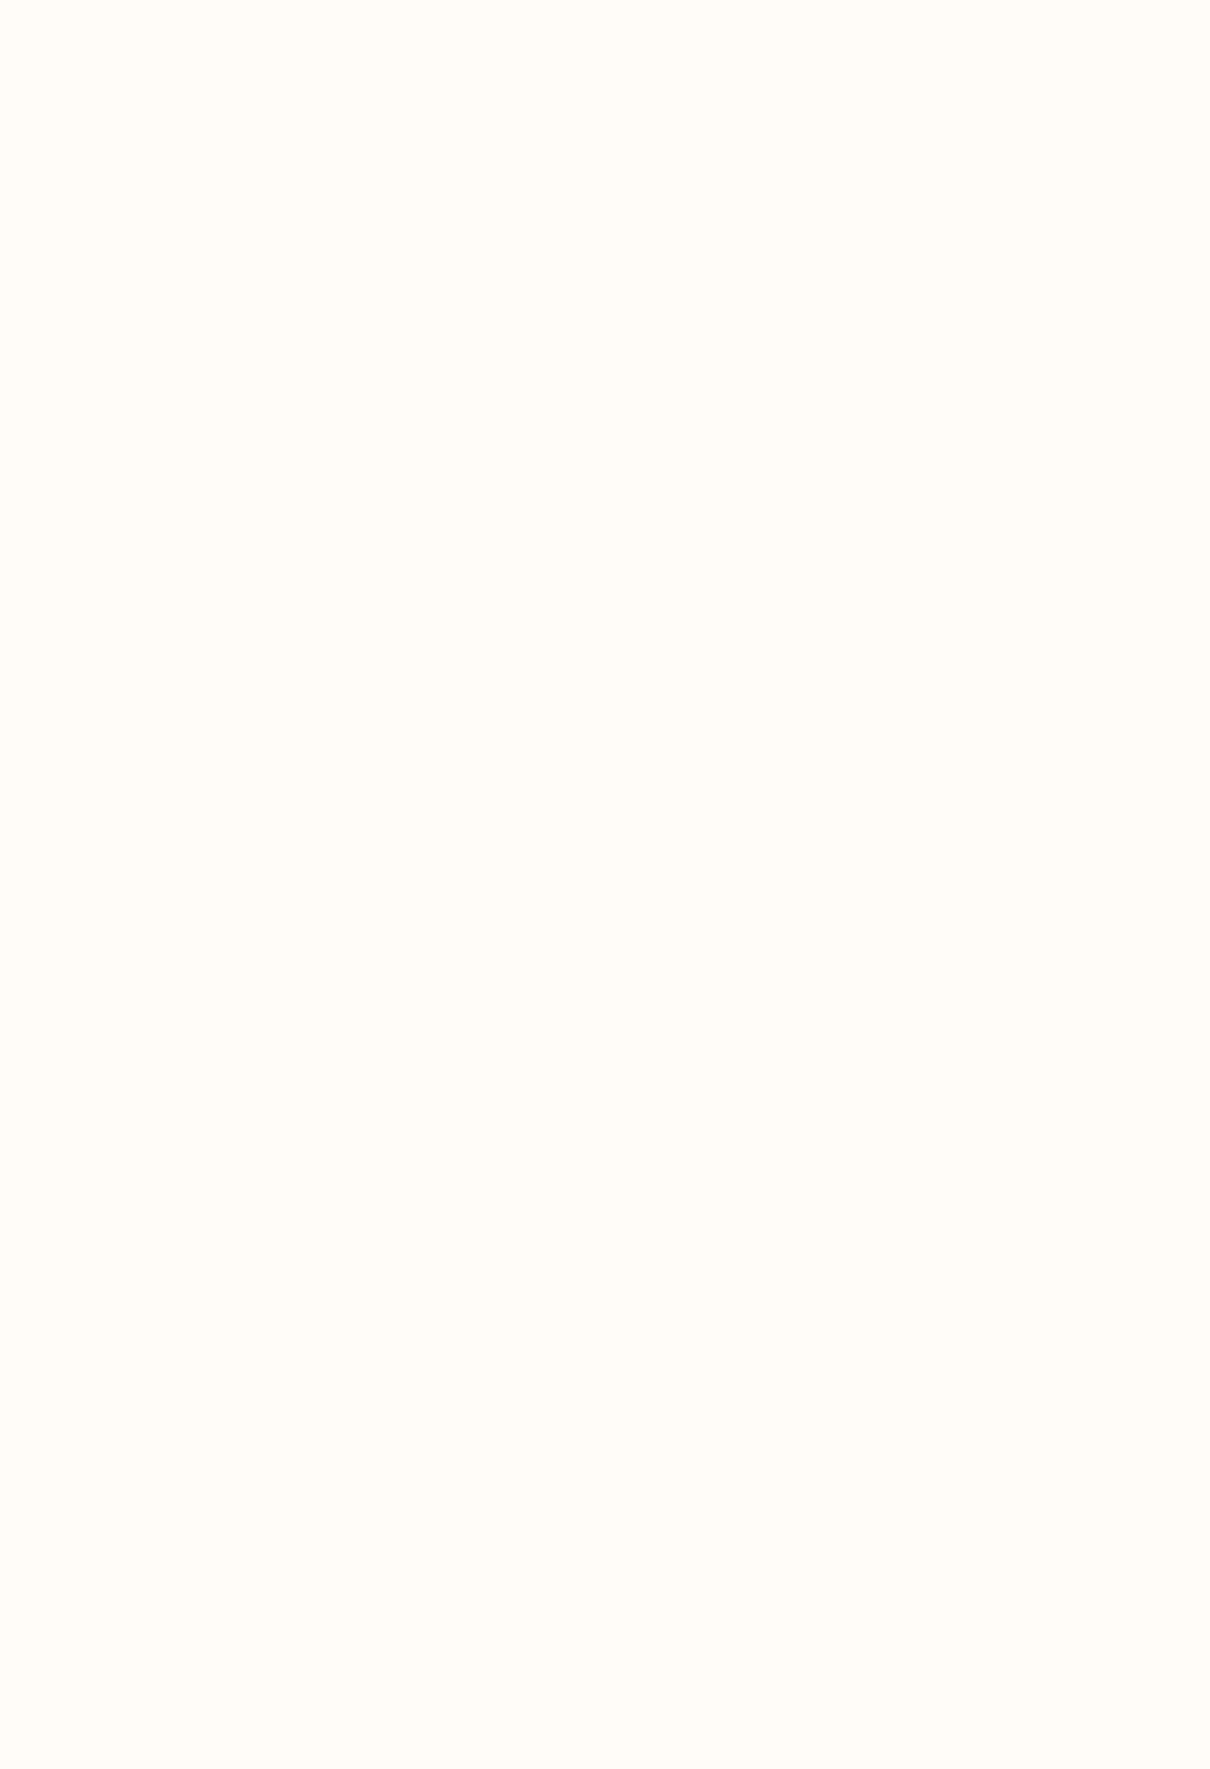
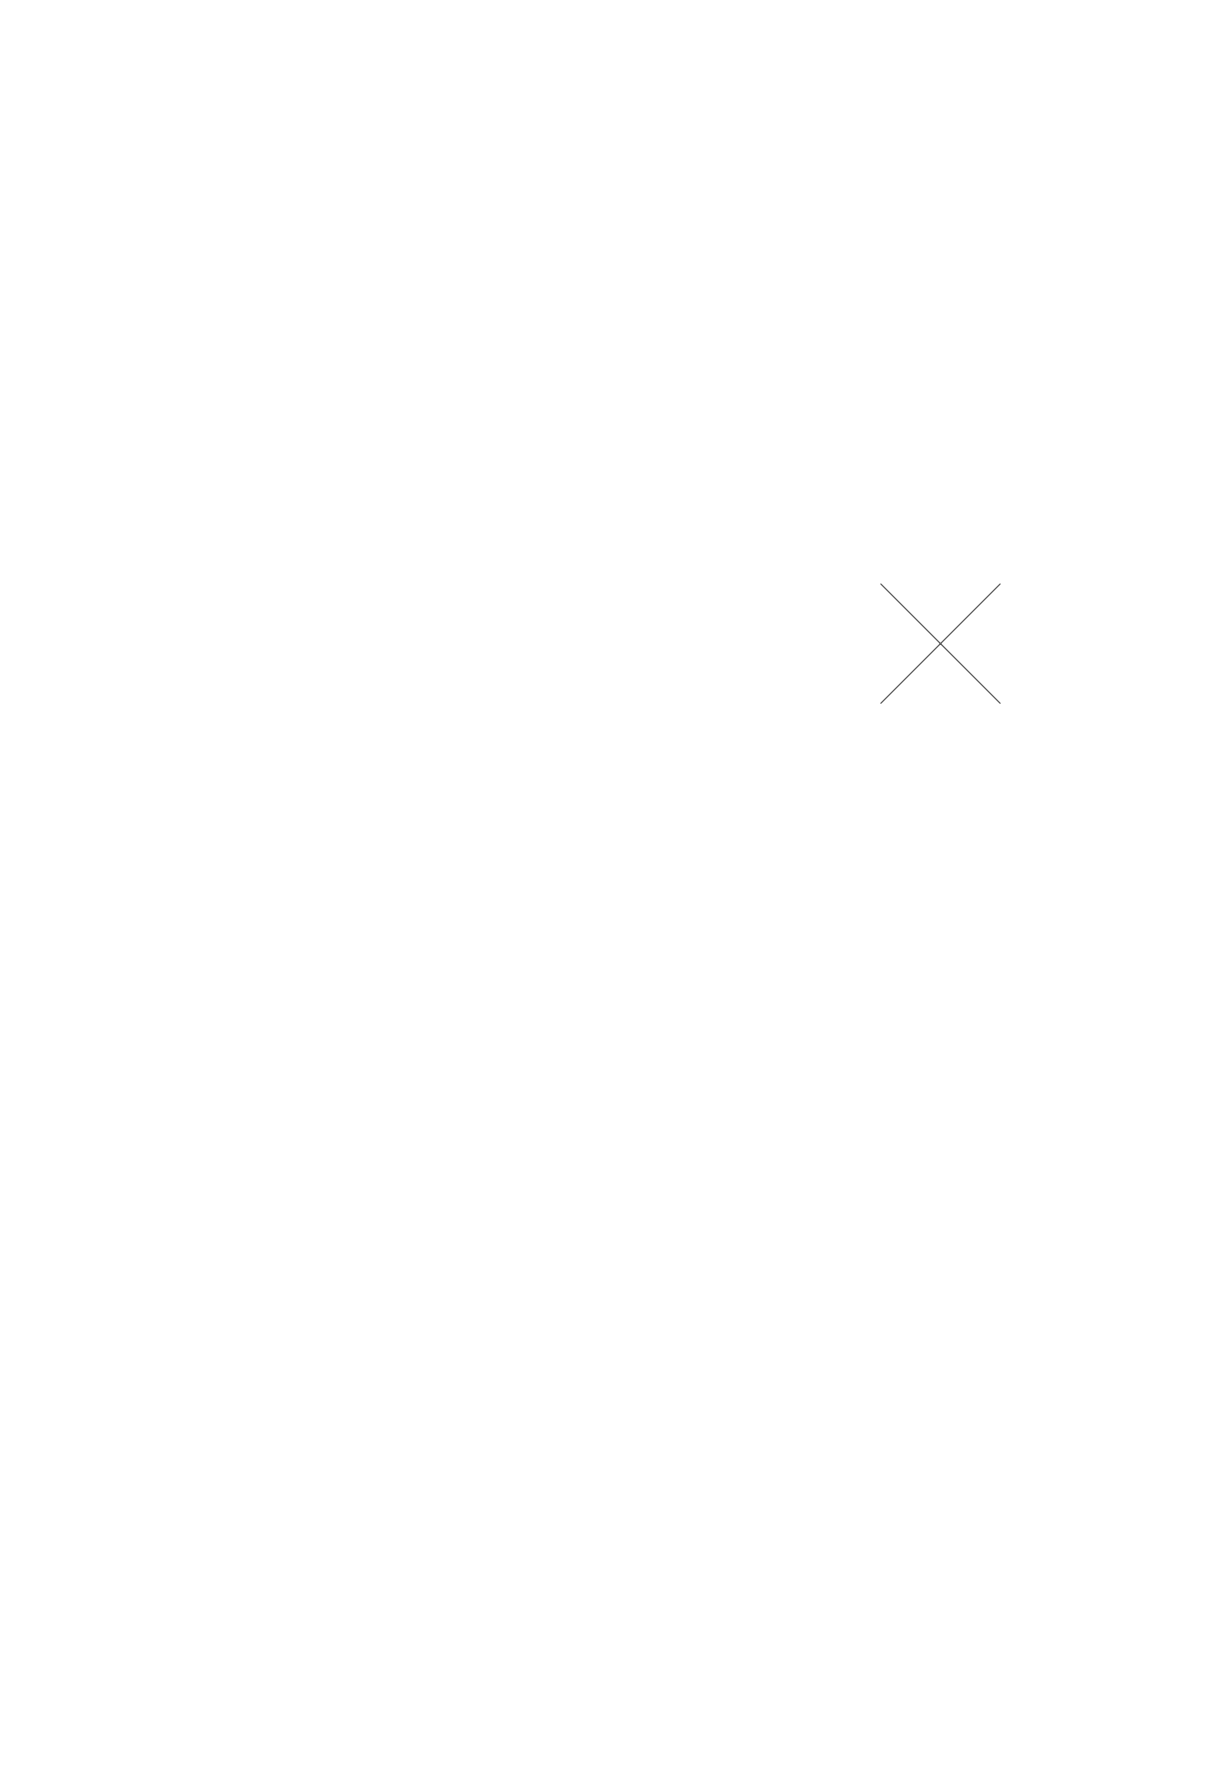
no-connect mark: none -> (940, 643)

